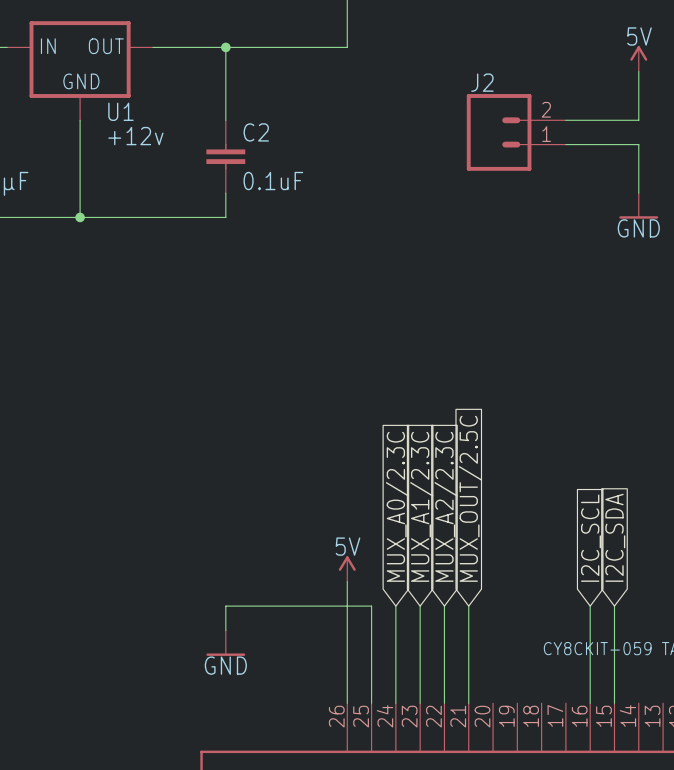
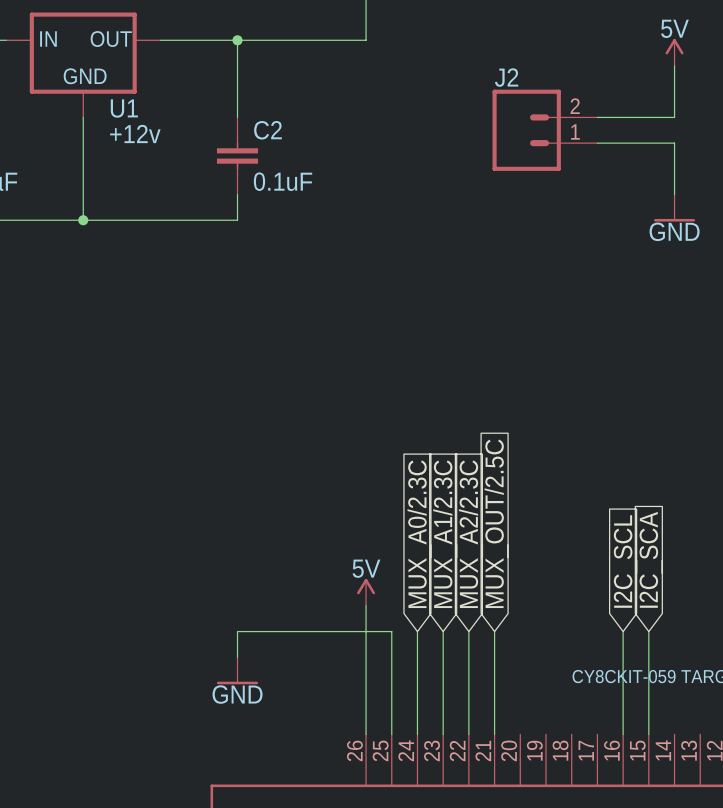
global label: I2C_SDA (615, 537) -> I2C_SCA (651, 559)

